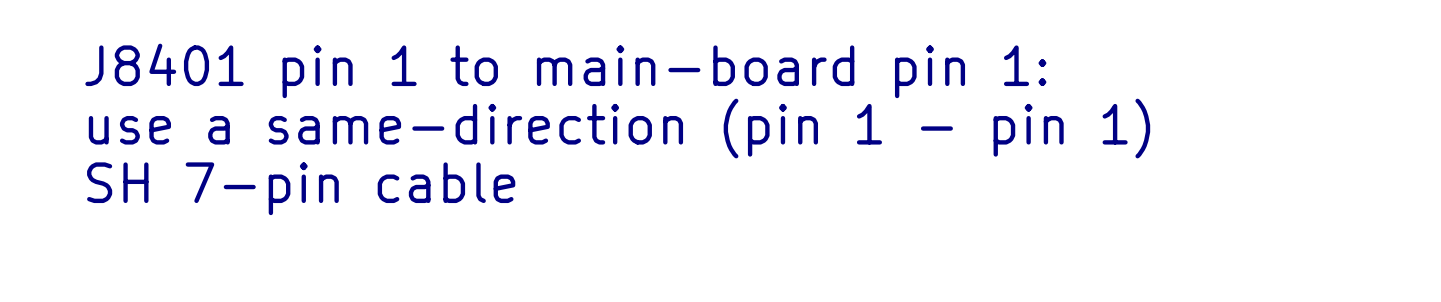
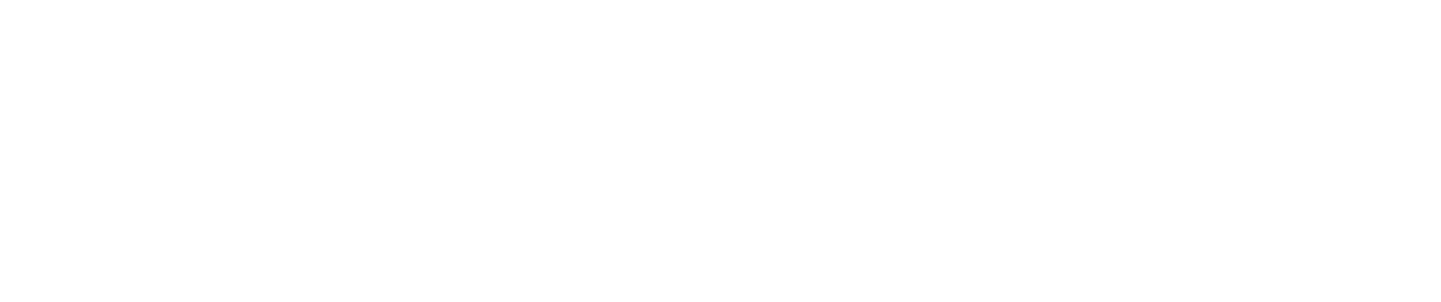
text: J8401 pin 1 to main-board pin 1: (565, 70) -> none
text: use a same-direction (pin 1 - pin 1) (619, 128) -> none
text: SH 7-pin cable (301, 188) -> none

